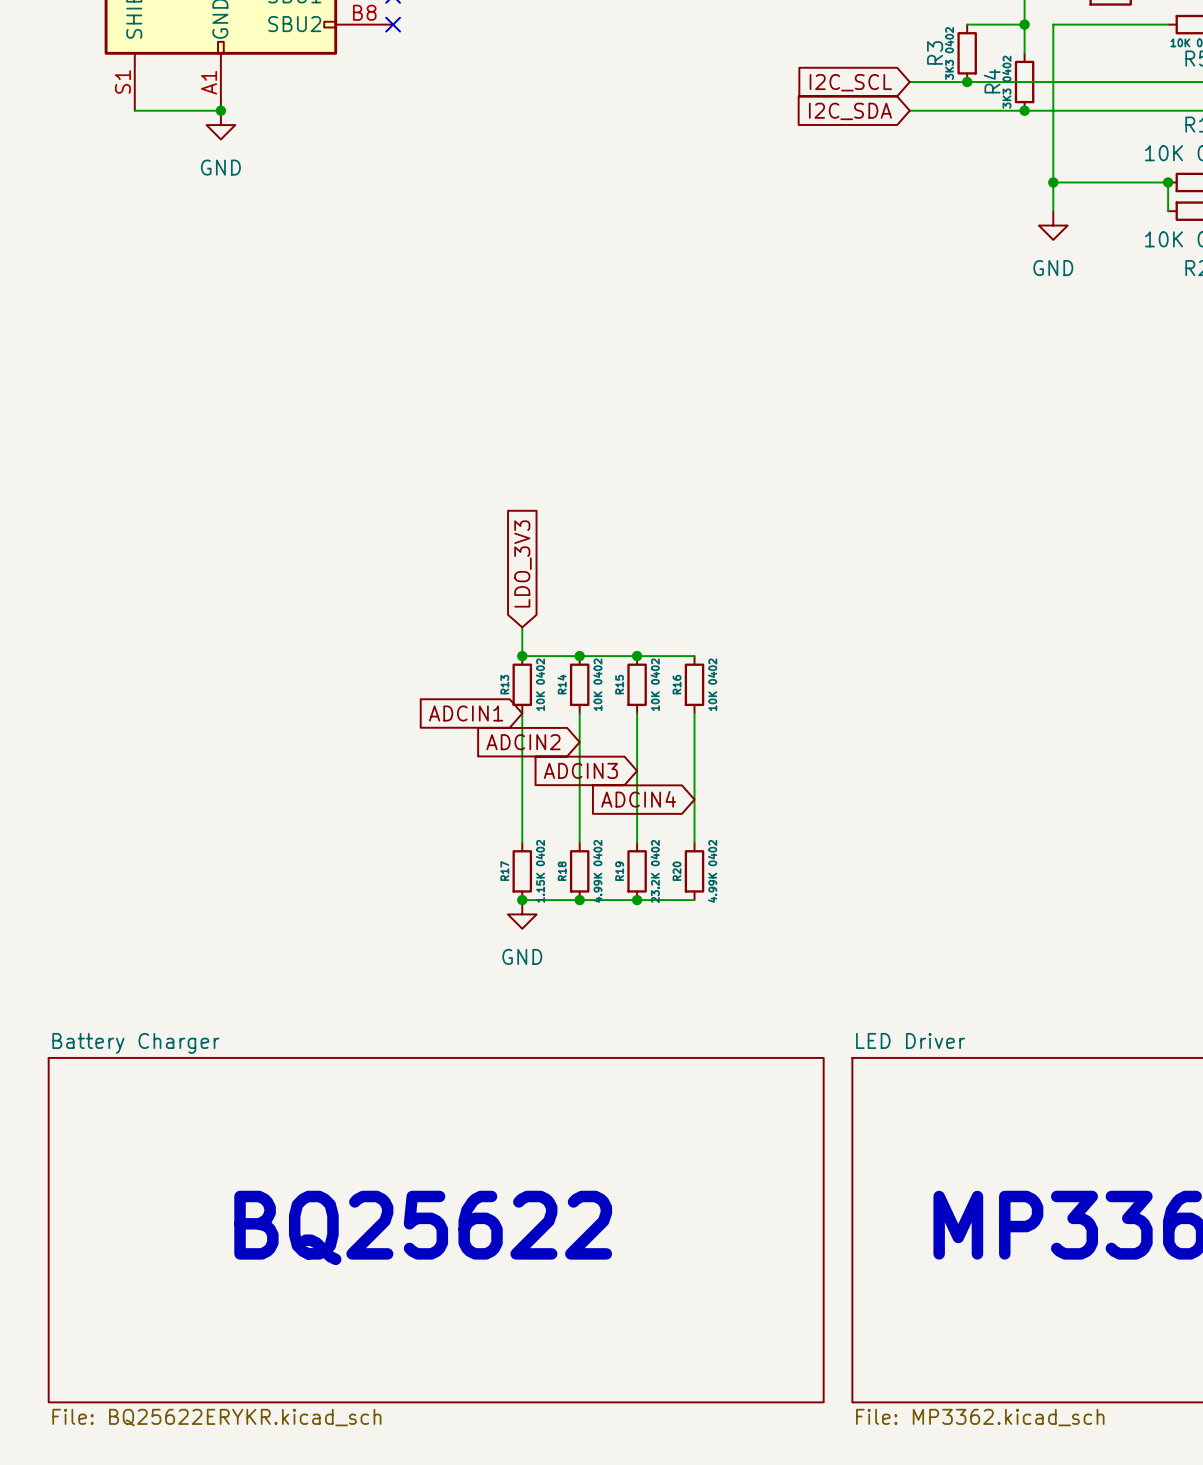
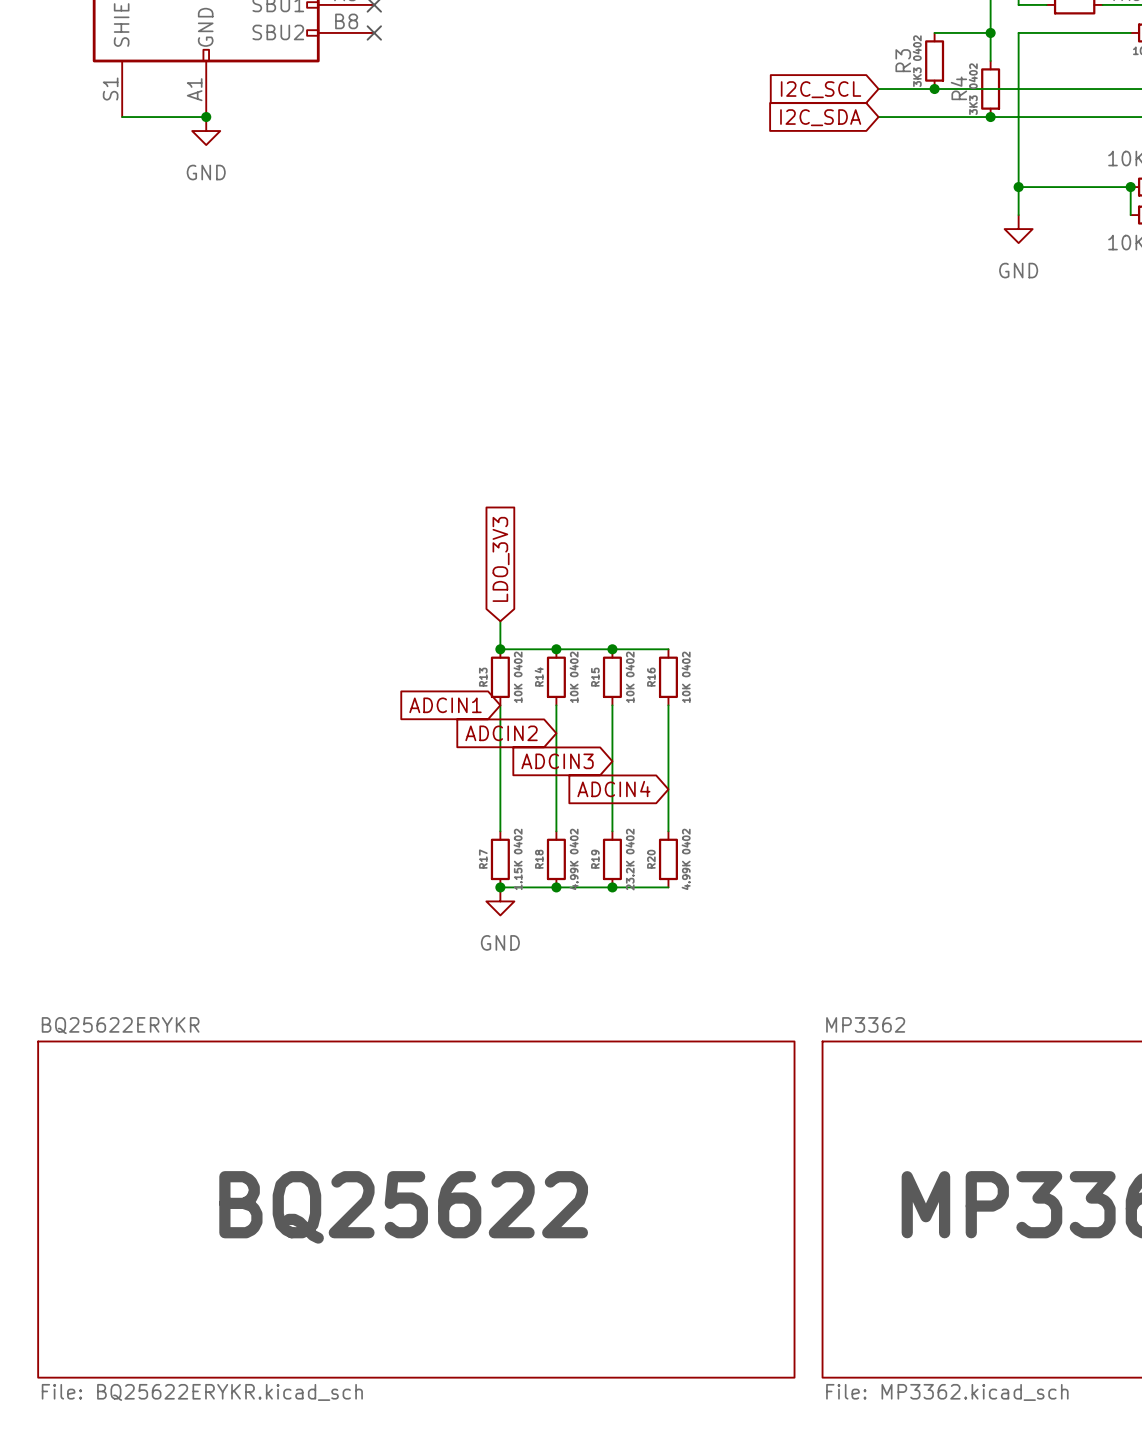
sheet LED Driver name: LED Driver (910, 1040) -> MP3362 (865, 1024)
sheet Battery Charger name: Battery Charger (135, 1043) -> BQ25622ERYKR (120, 1025)

